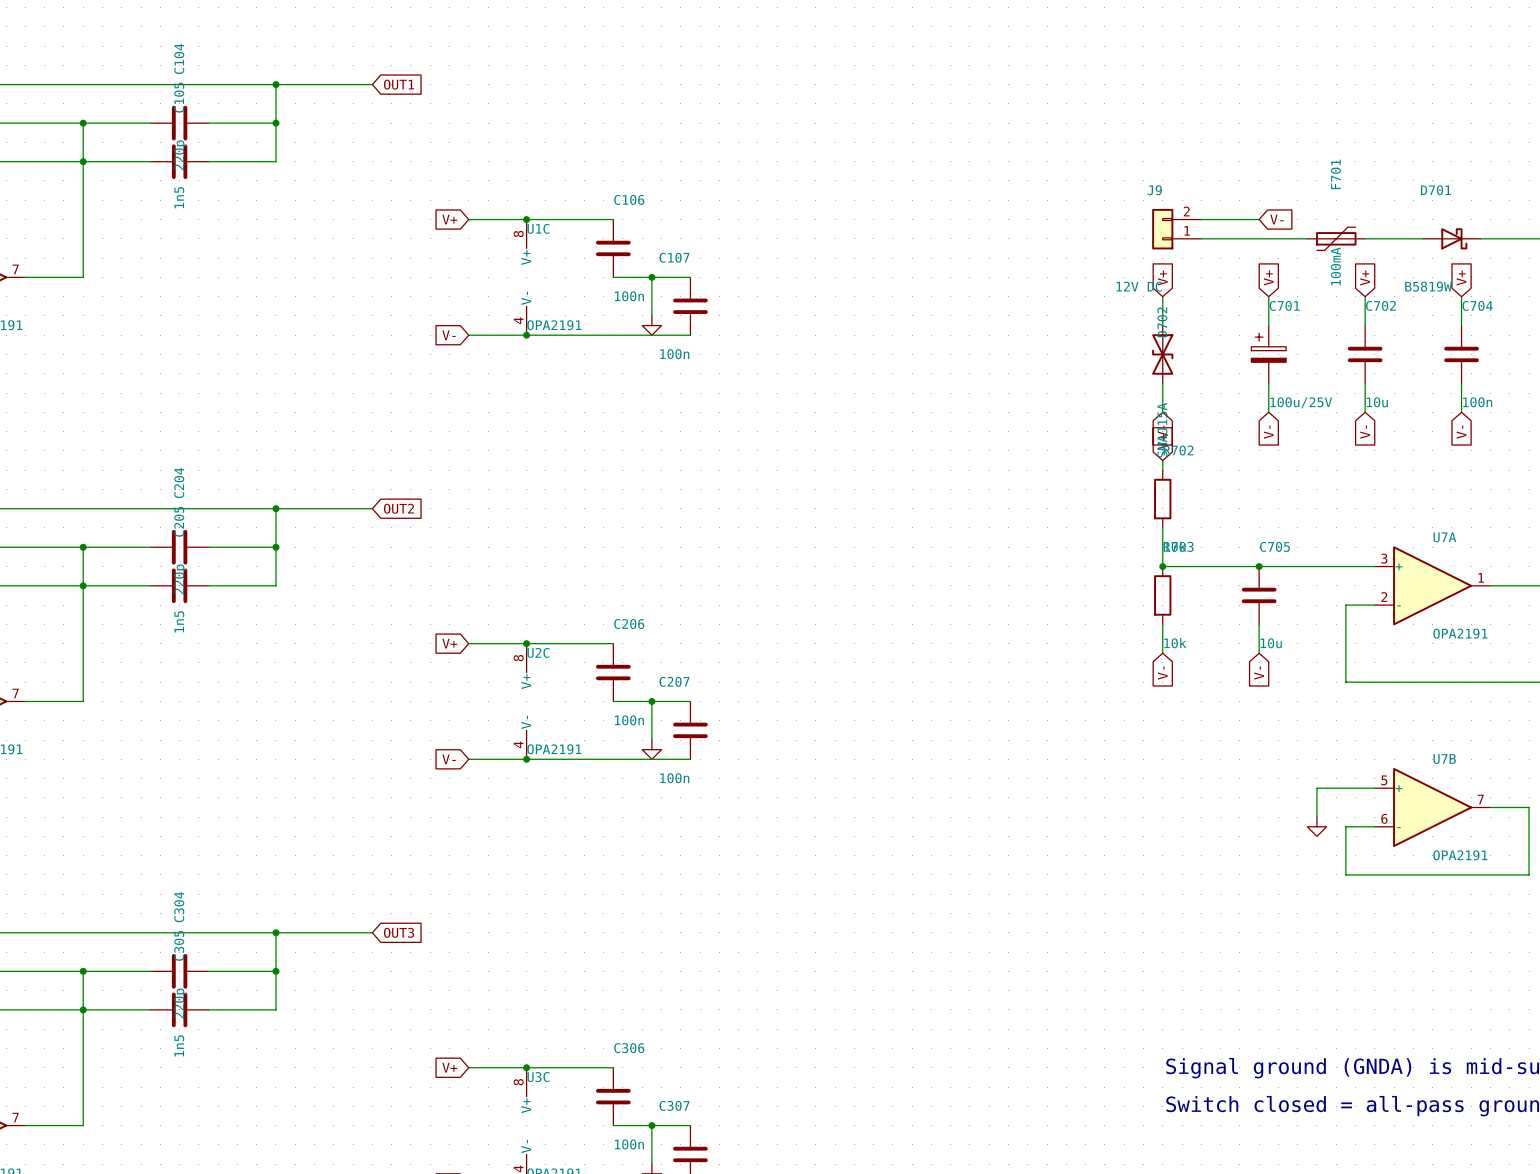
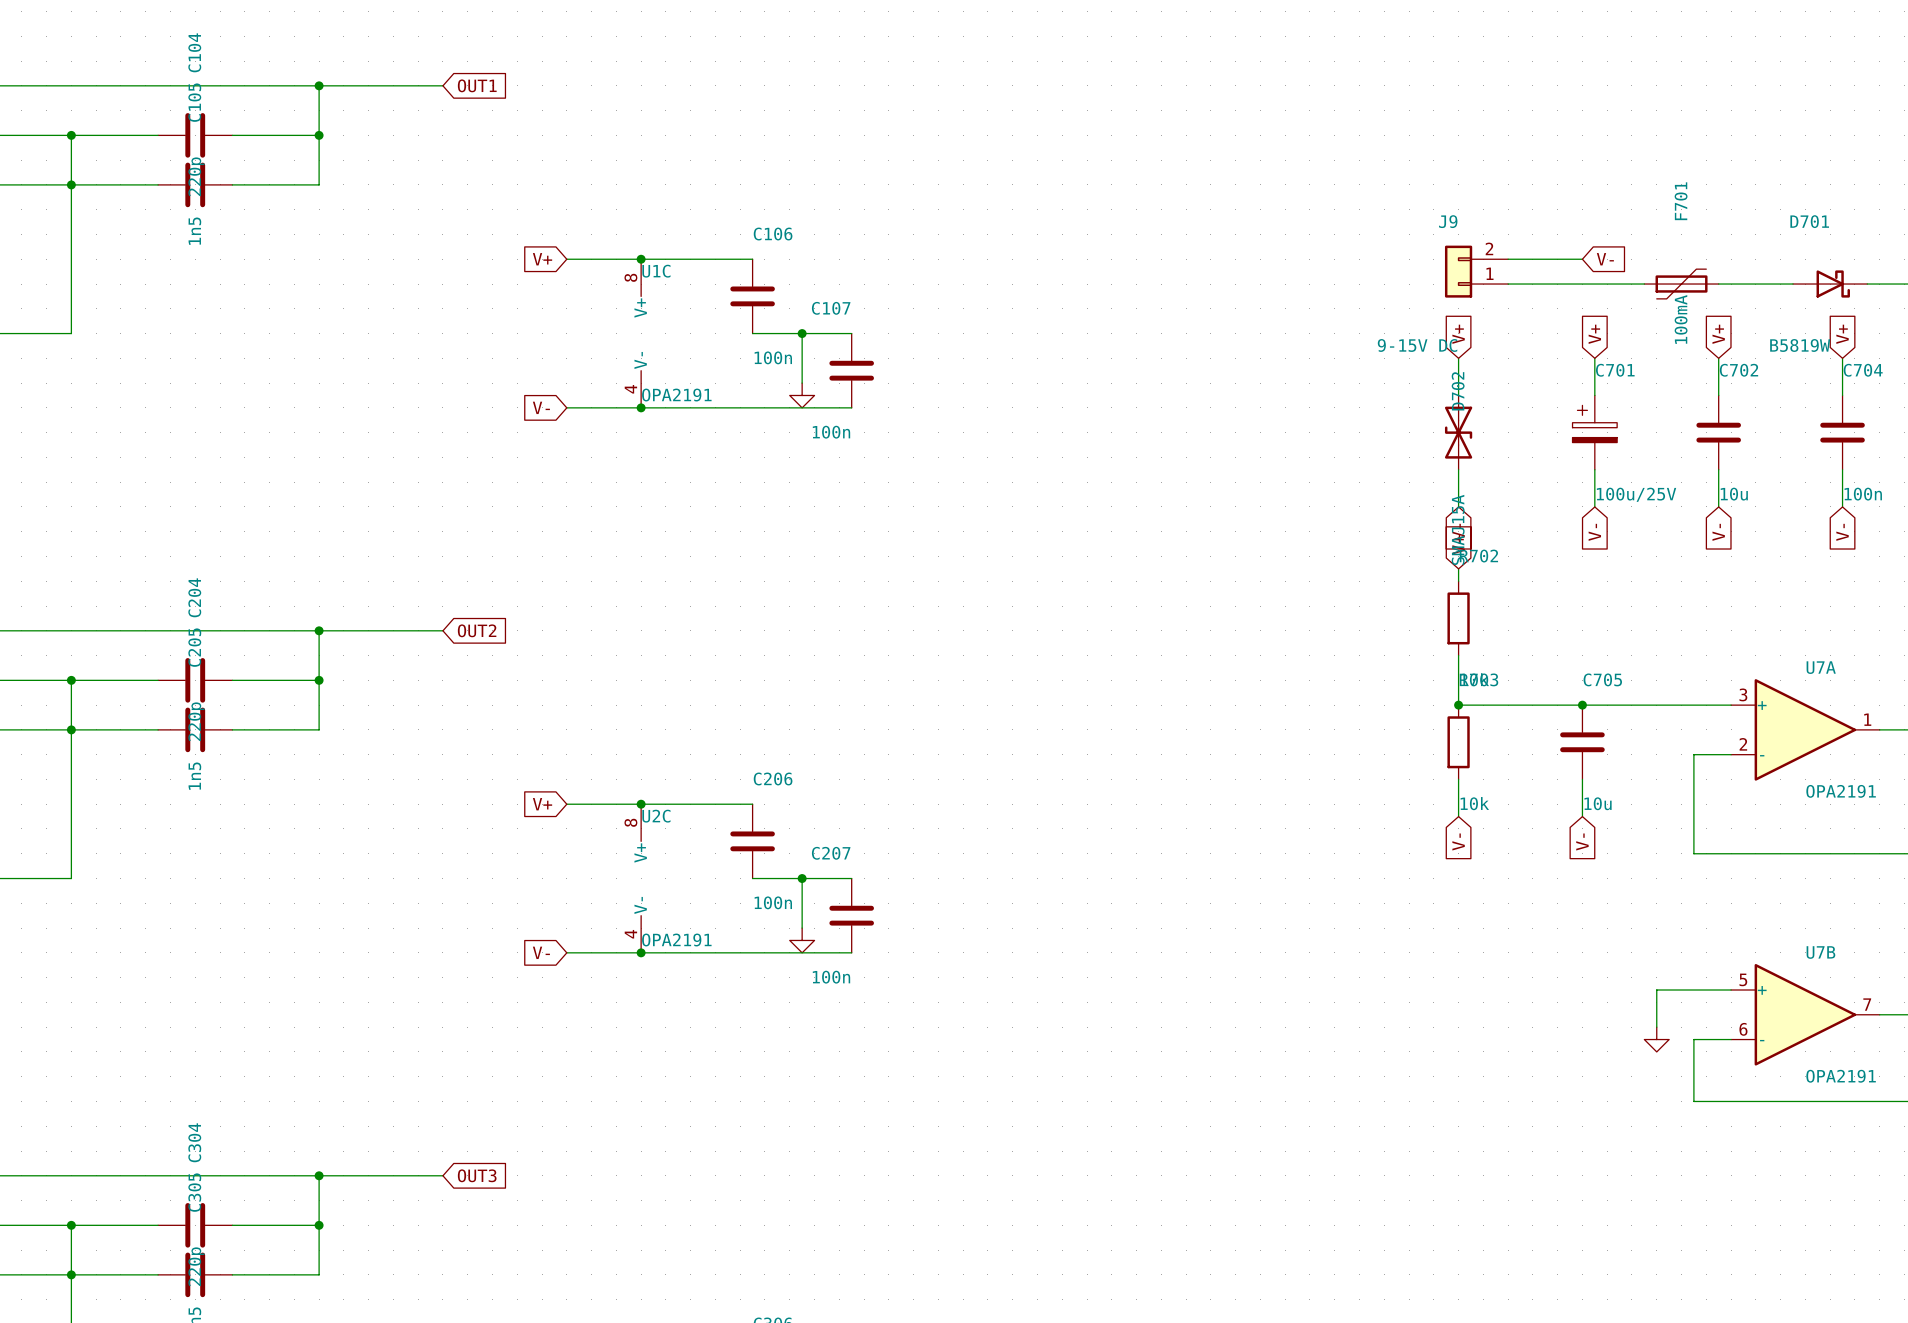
J9 value: 12V DC (1139, 286) -> 9-15V DC (1417, 345)

